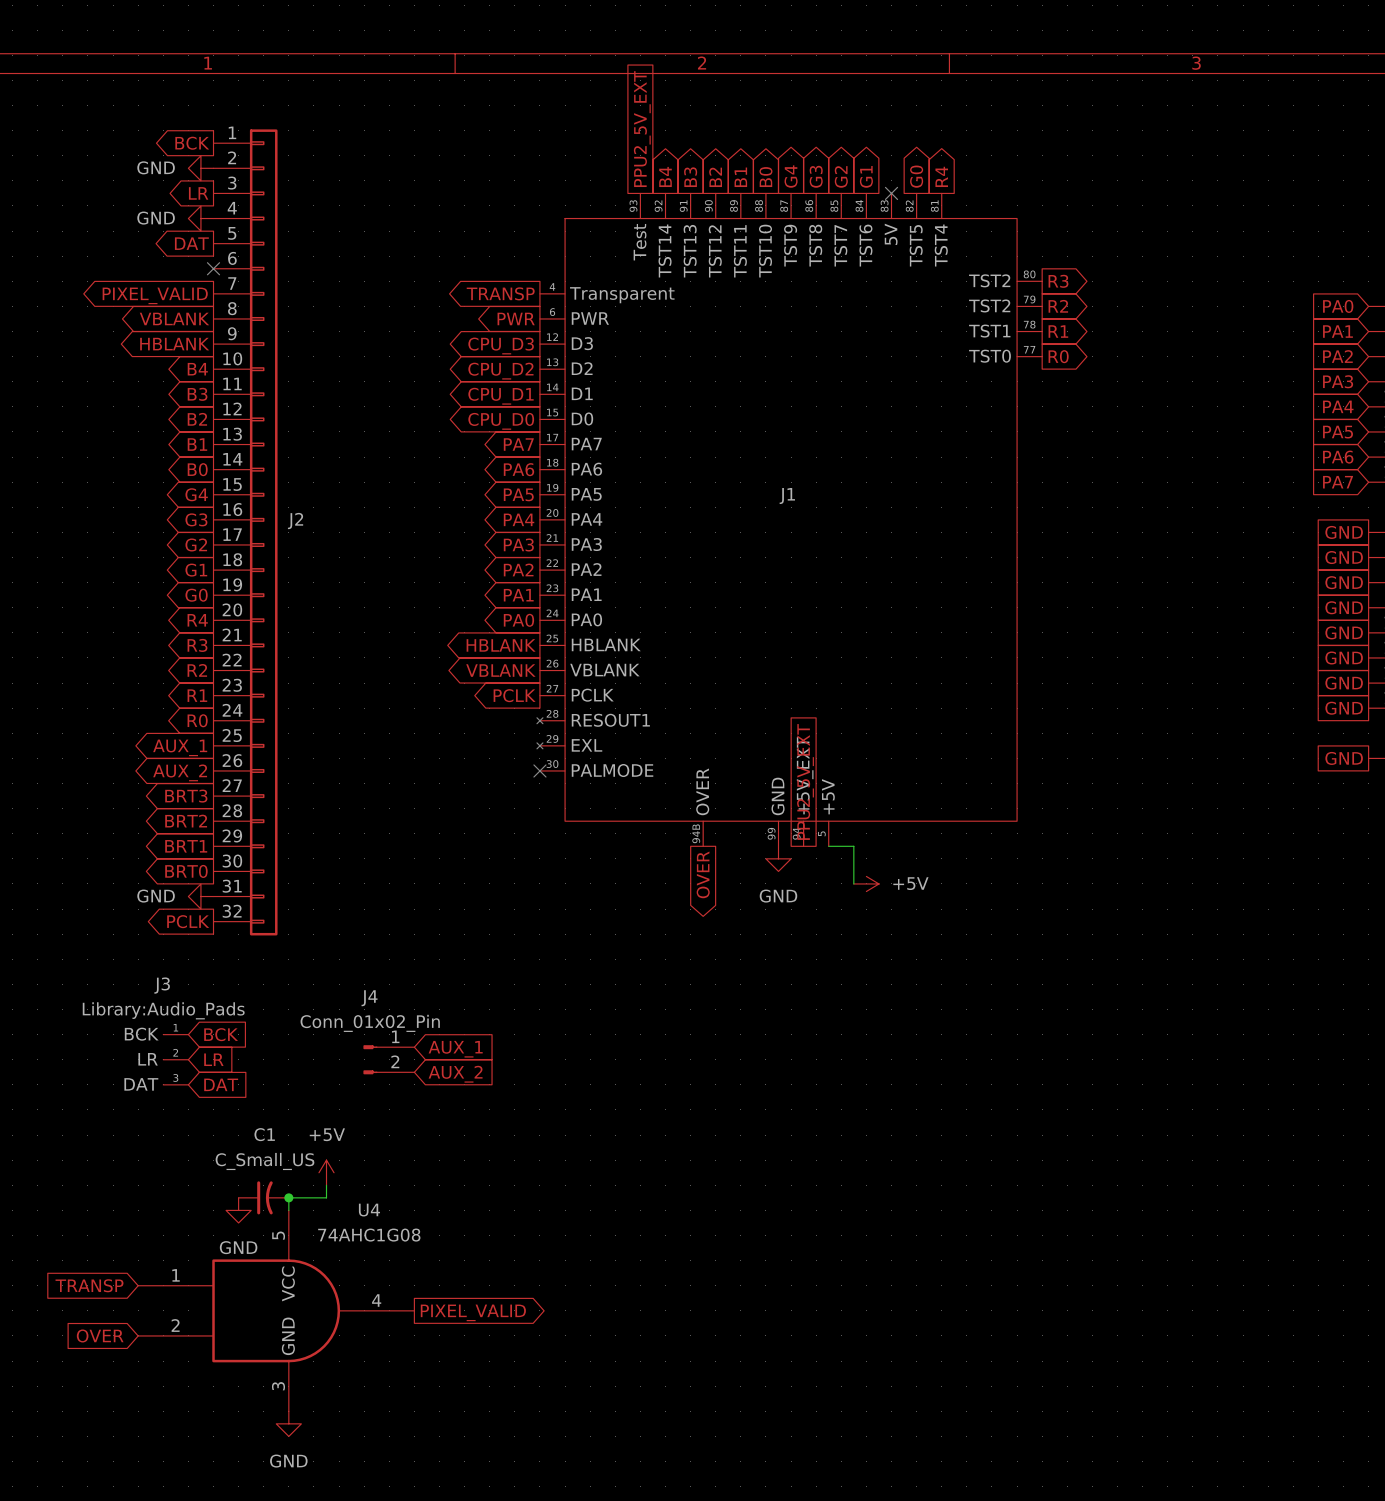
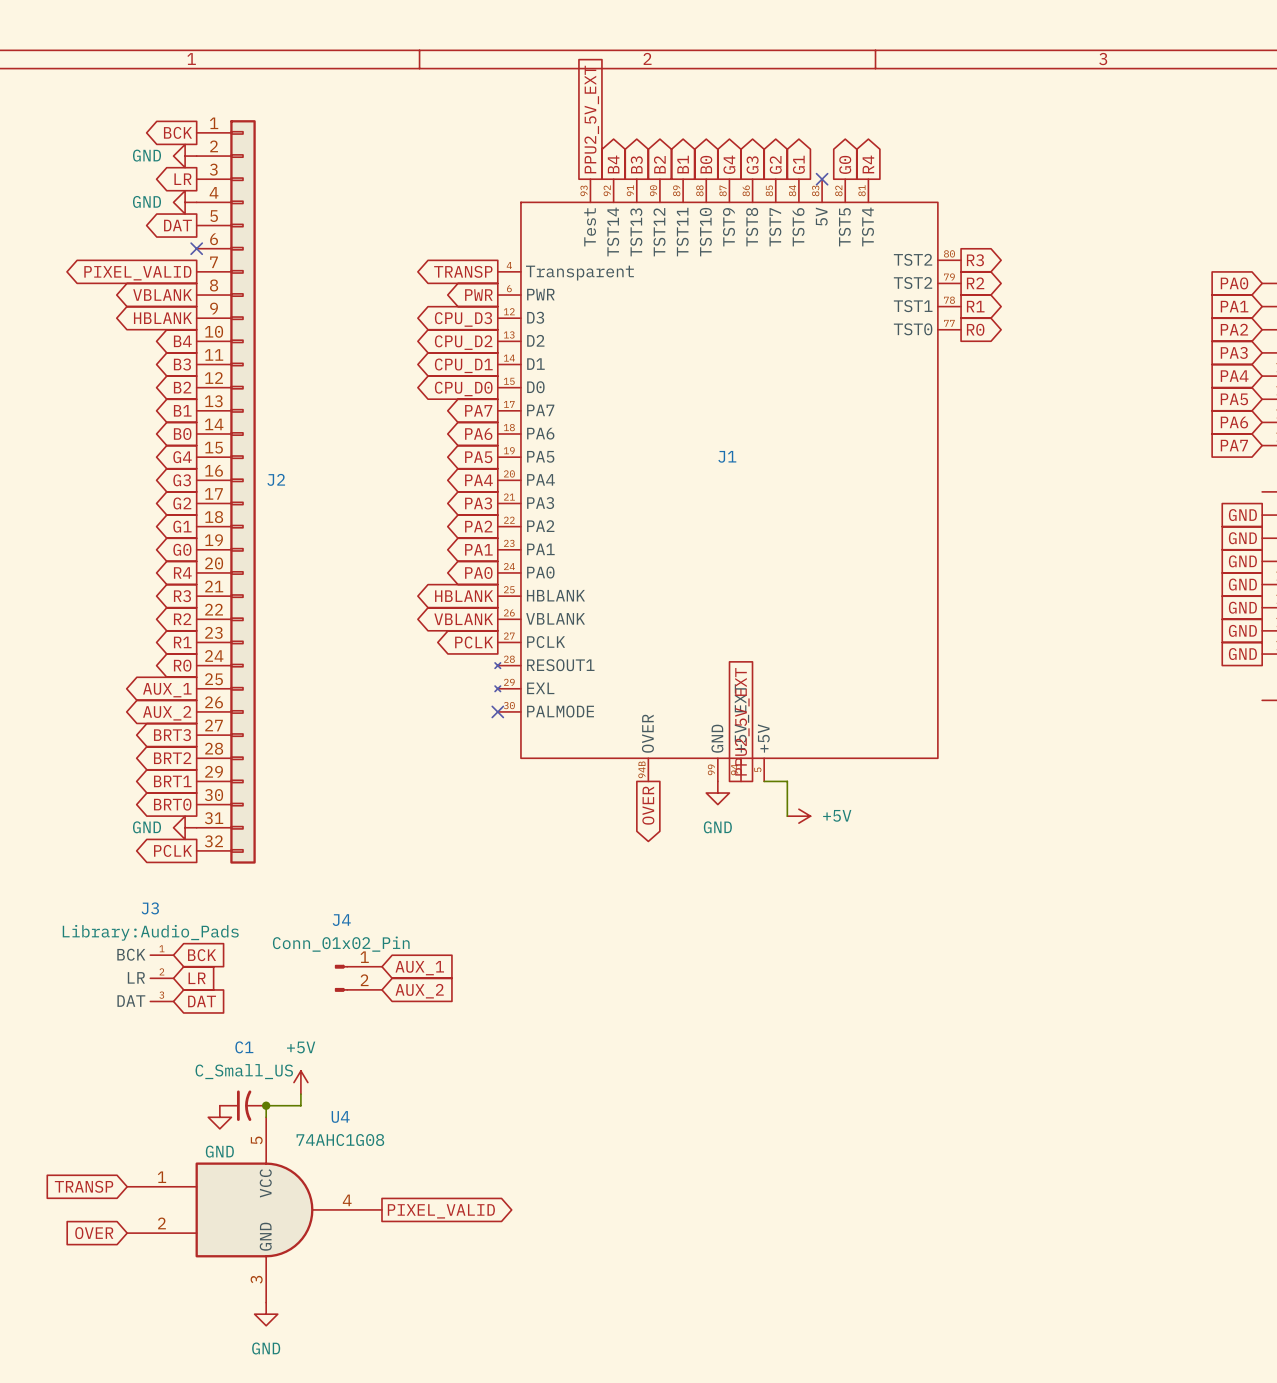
global label: GND (1344, 532) -> none
global label: GND (1344, 758) -> none

